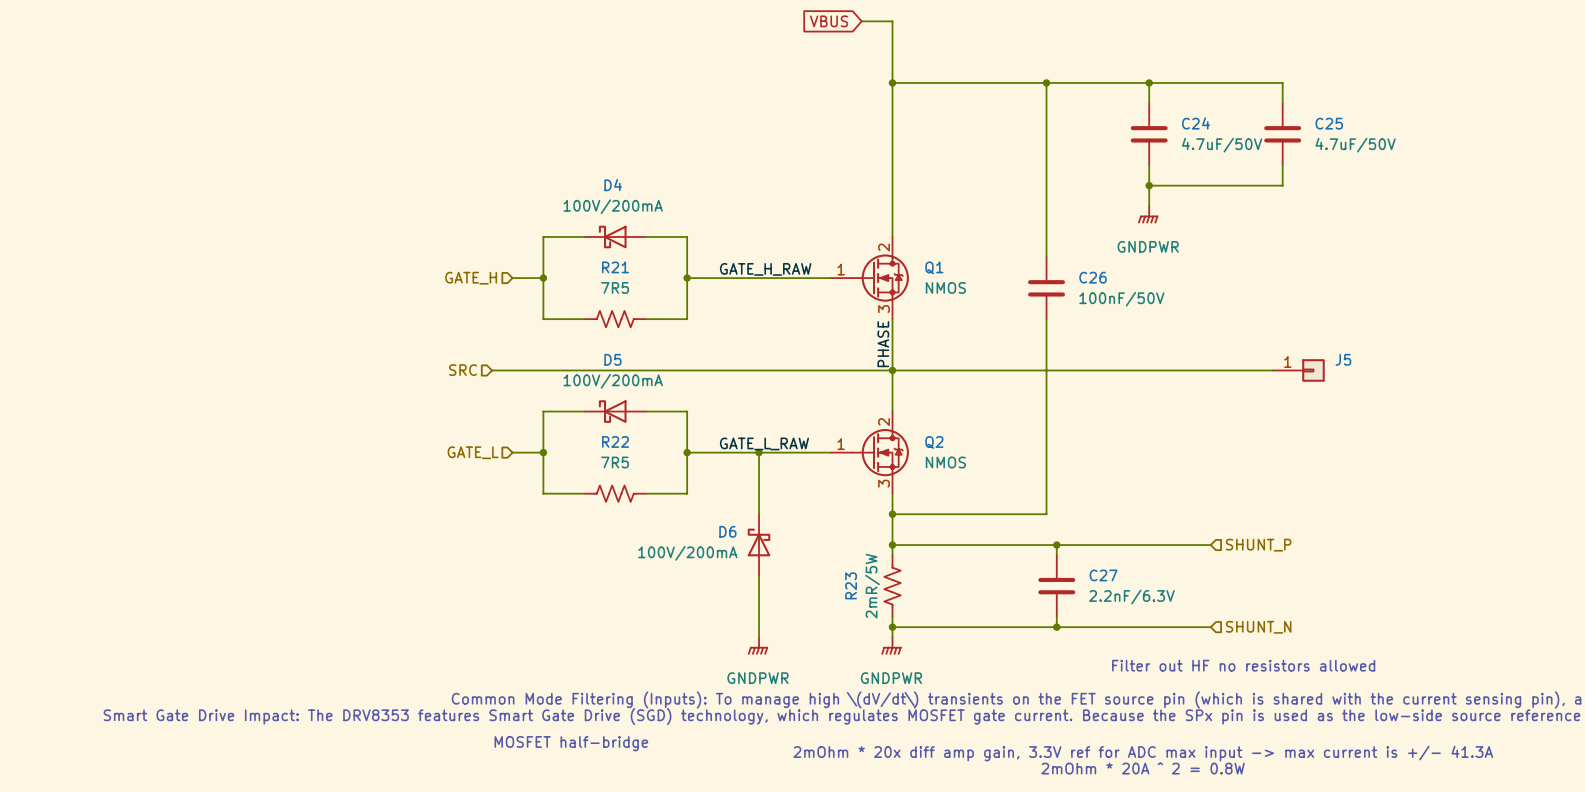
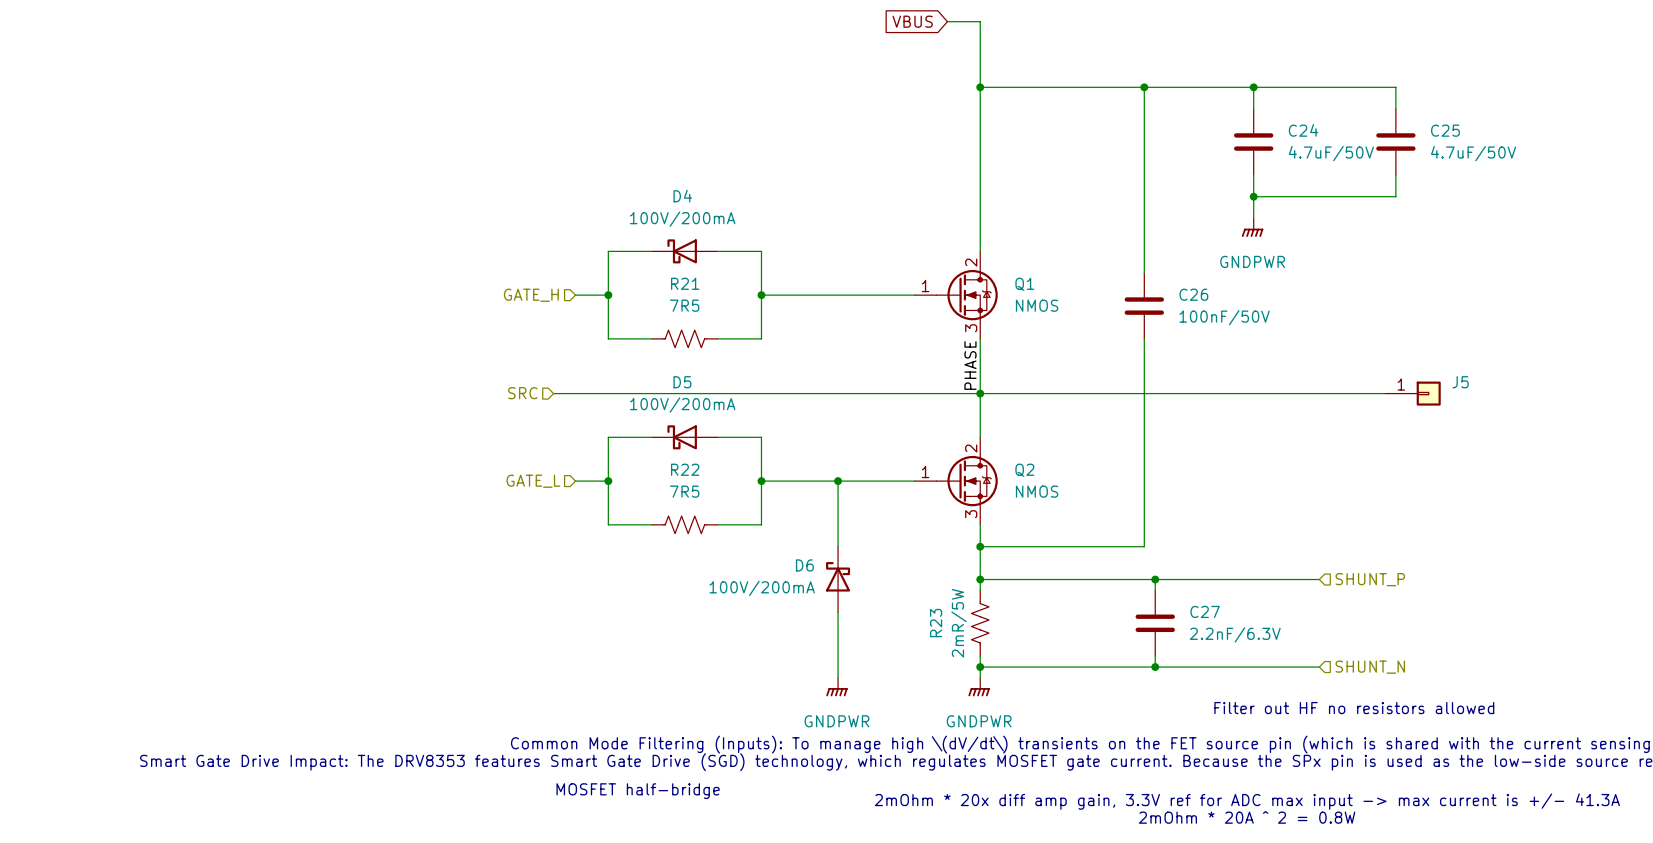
label: GATE_H_RAW (765, 269) -> none
label: GATE_L_RAW (764, 443) -> none

